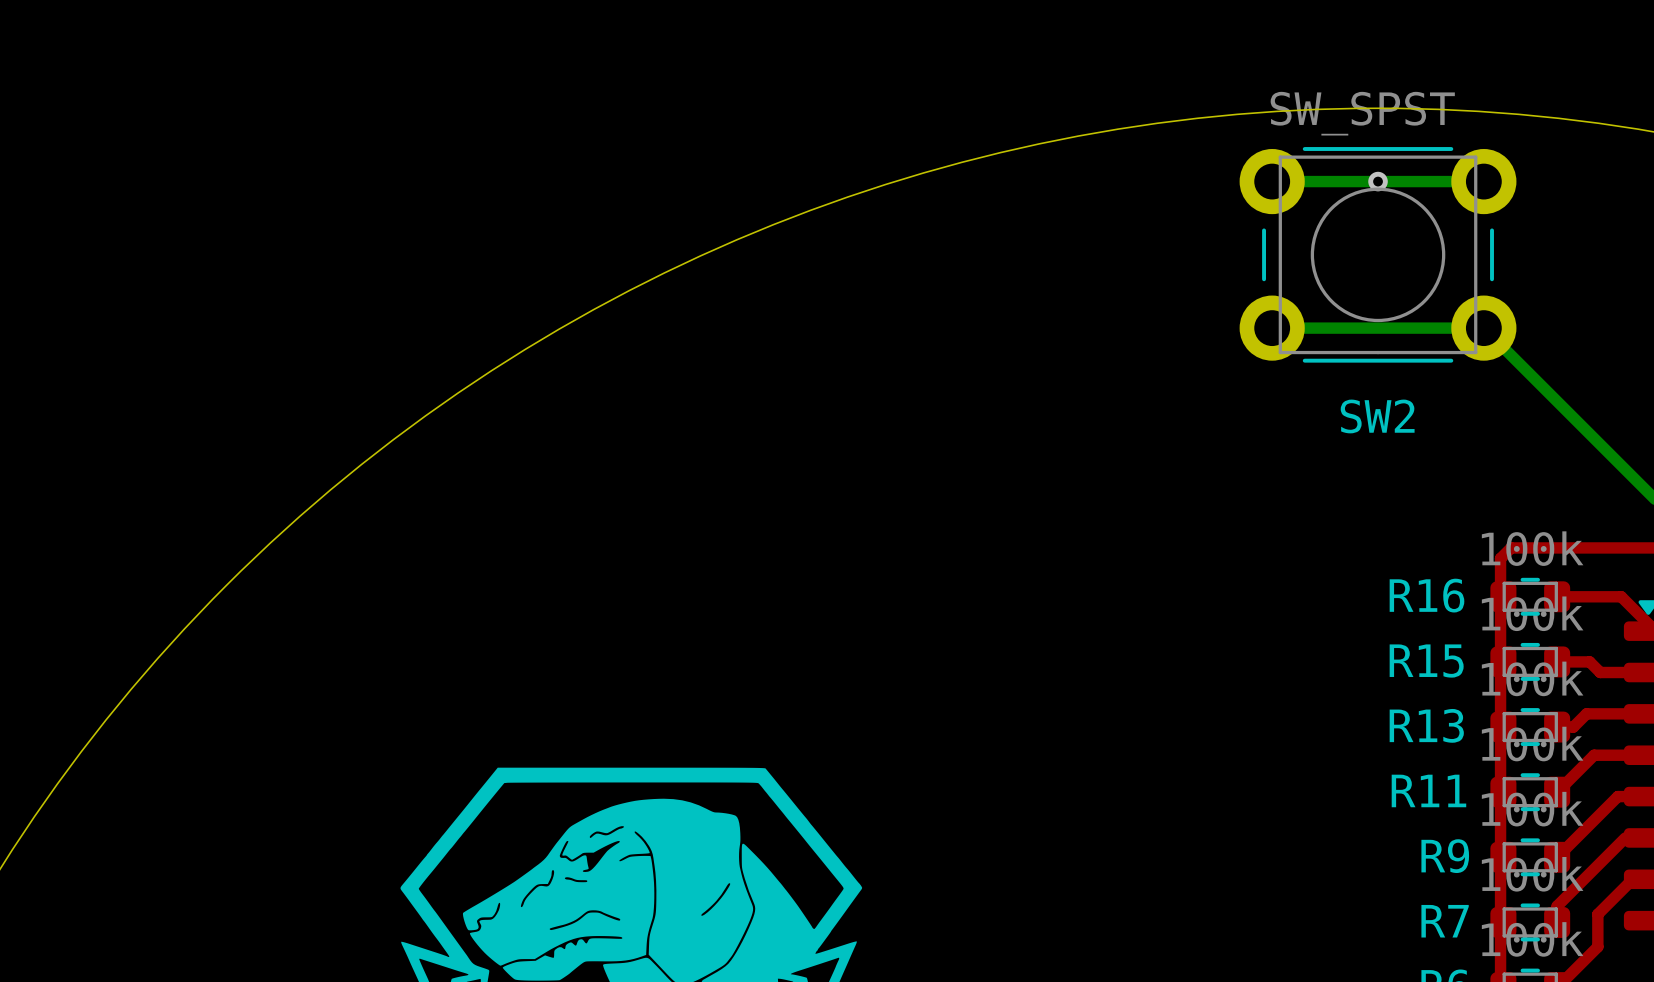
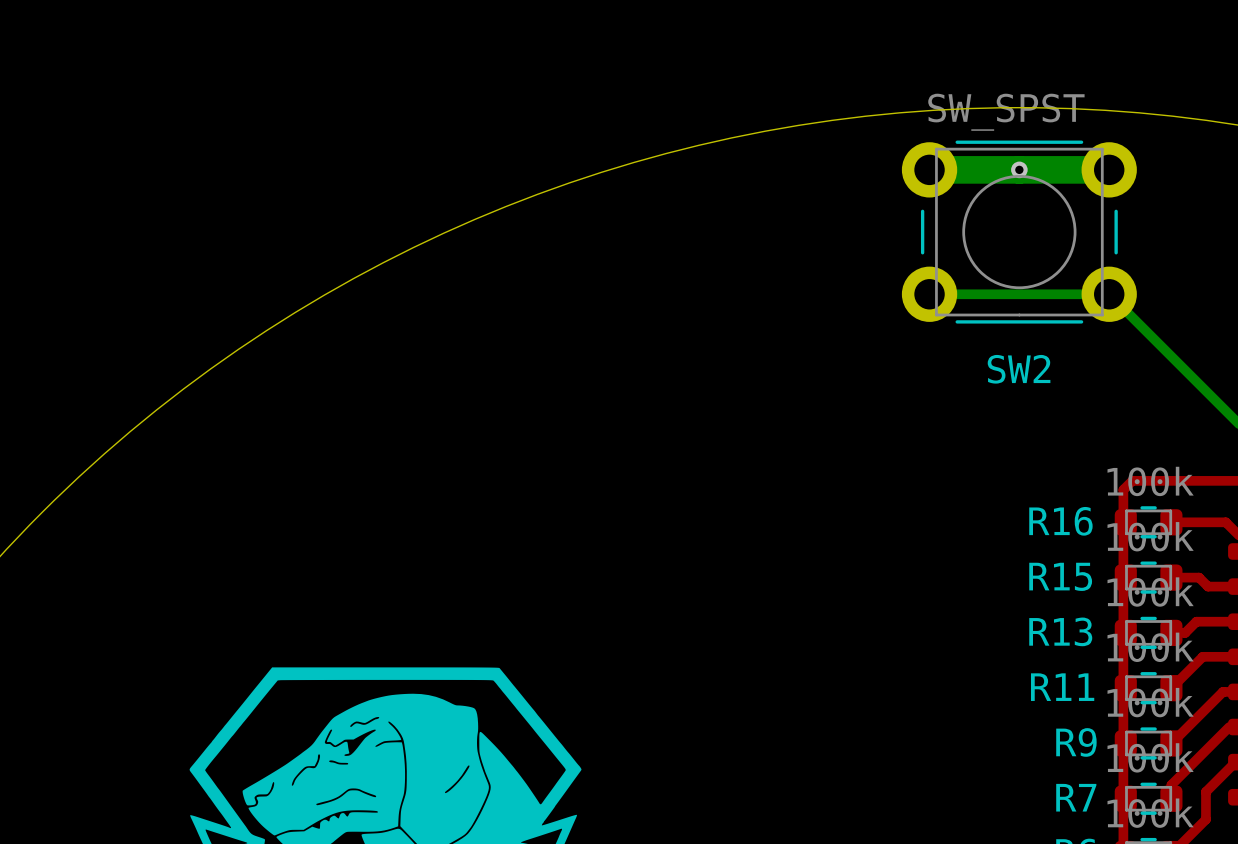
bottom track width: thin (1272, 181) (1483, 181) -> thick (929, 169) (1109, 169)

